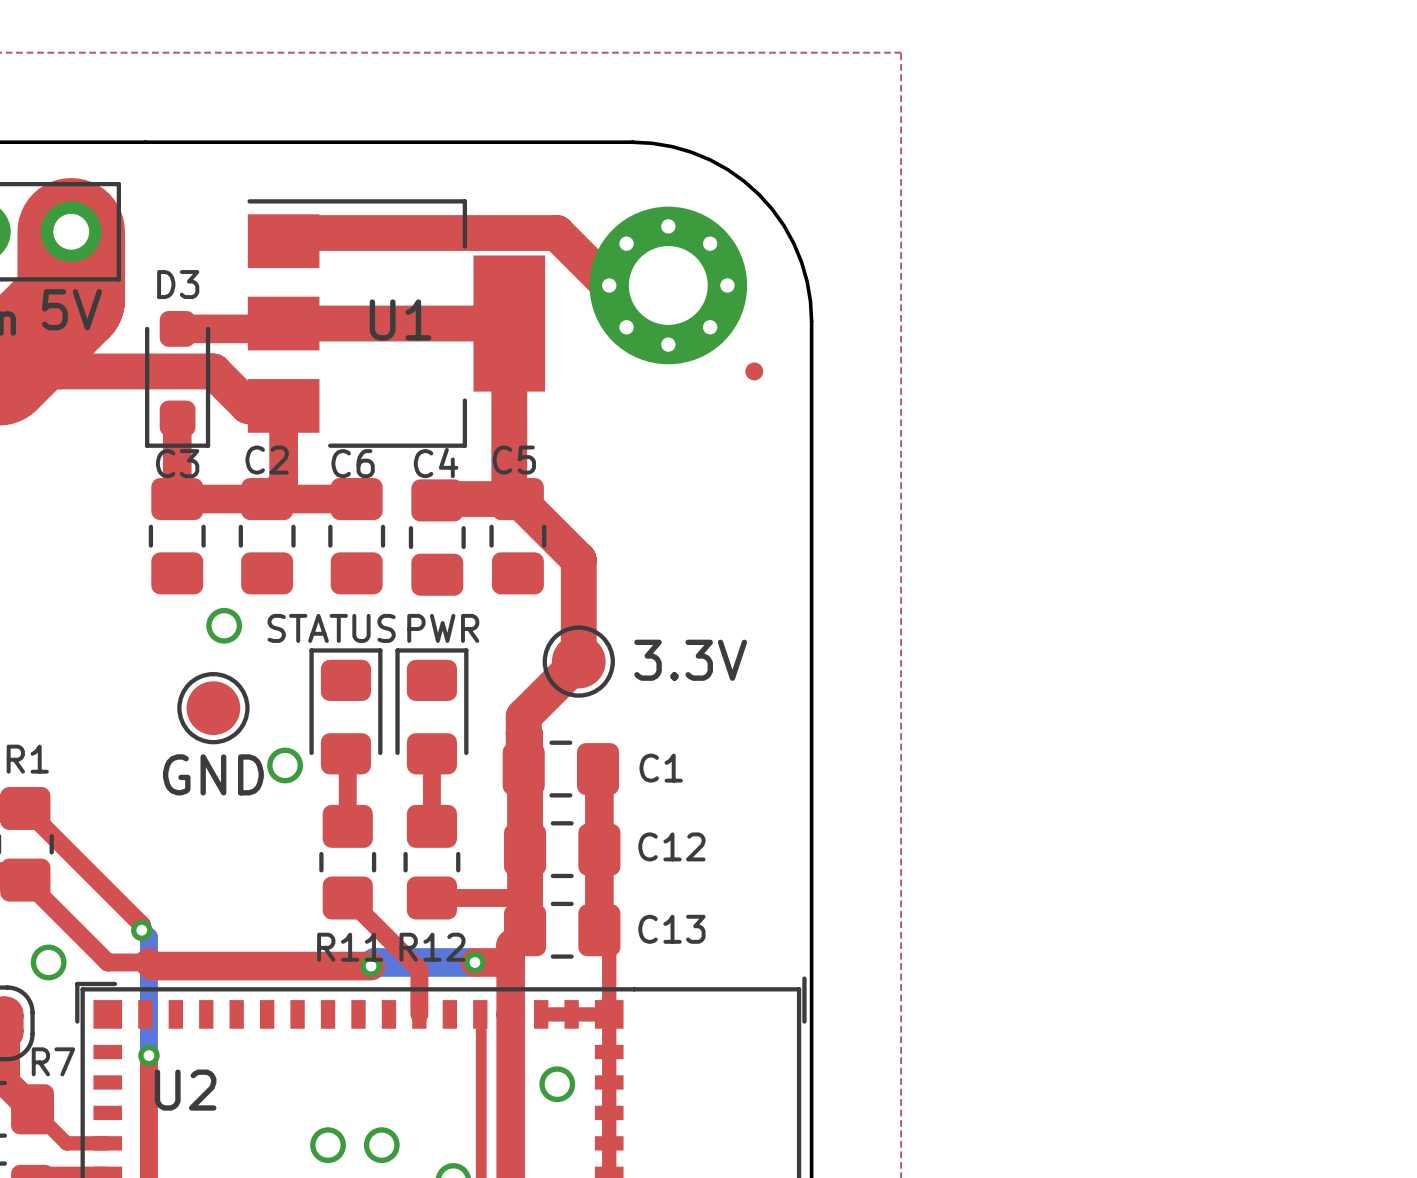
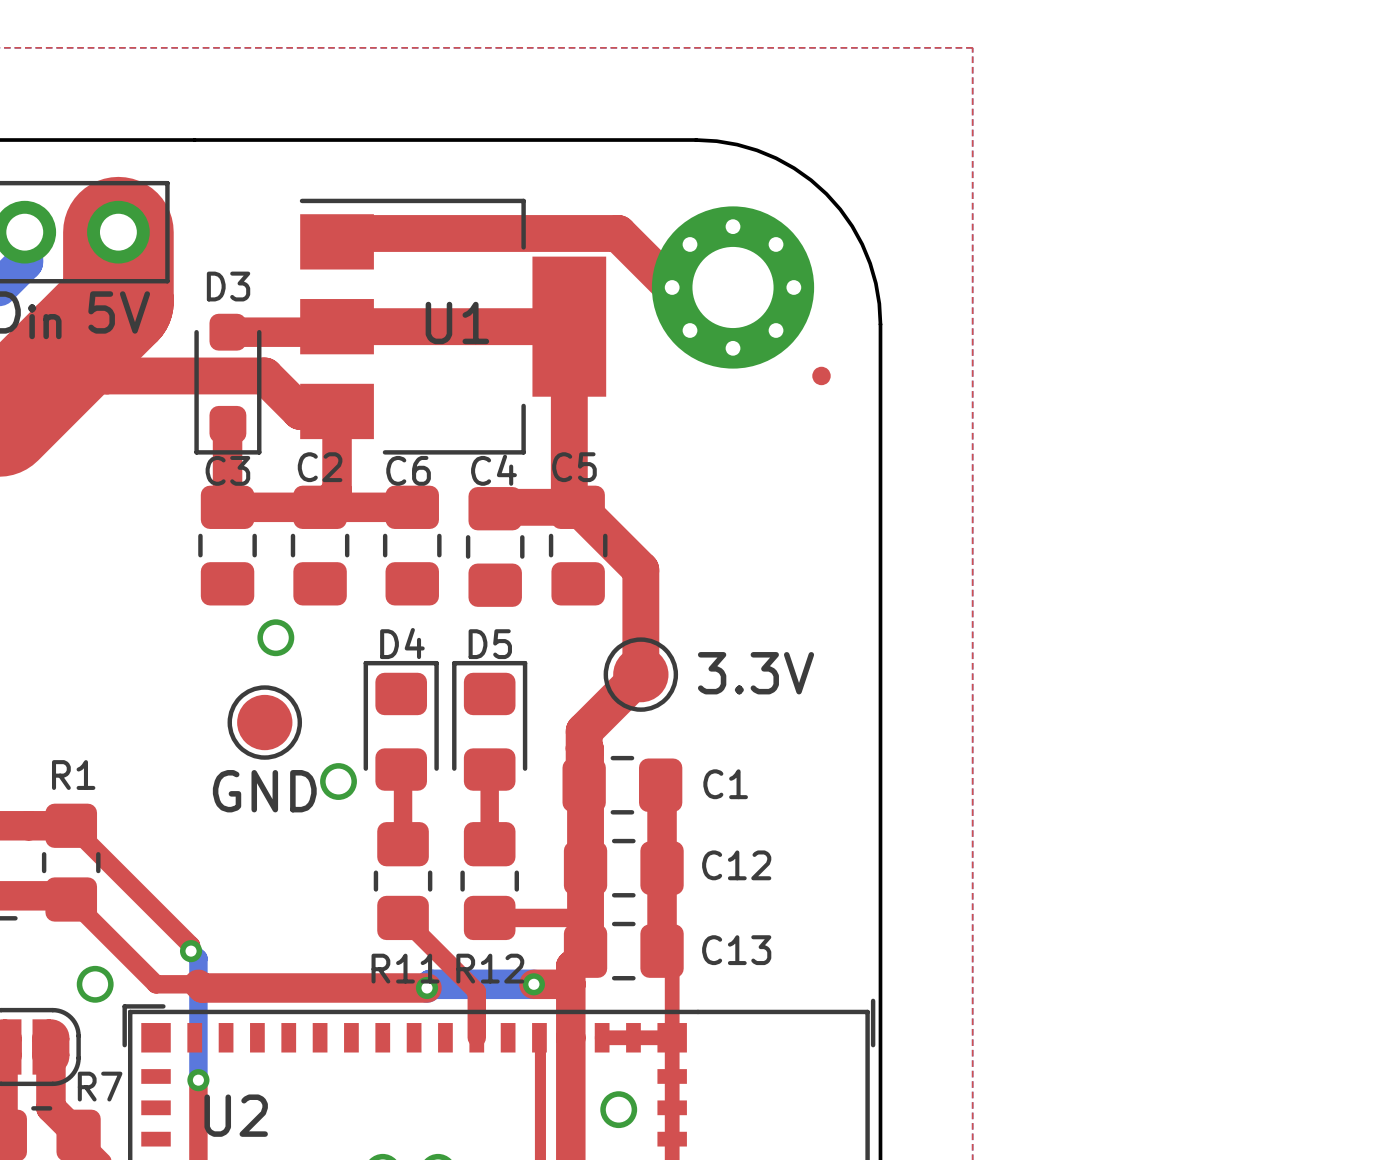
D4 value: STATUS (331, 628) -> none
D5 value: PWR (443, 628) -> none
D4 name: none -> D4 (402, 643)
D5 name: none -> D5 (490, 644)

